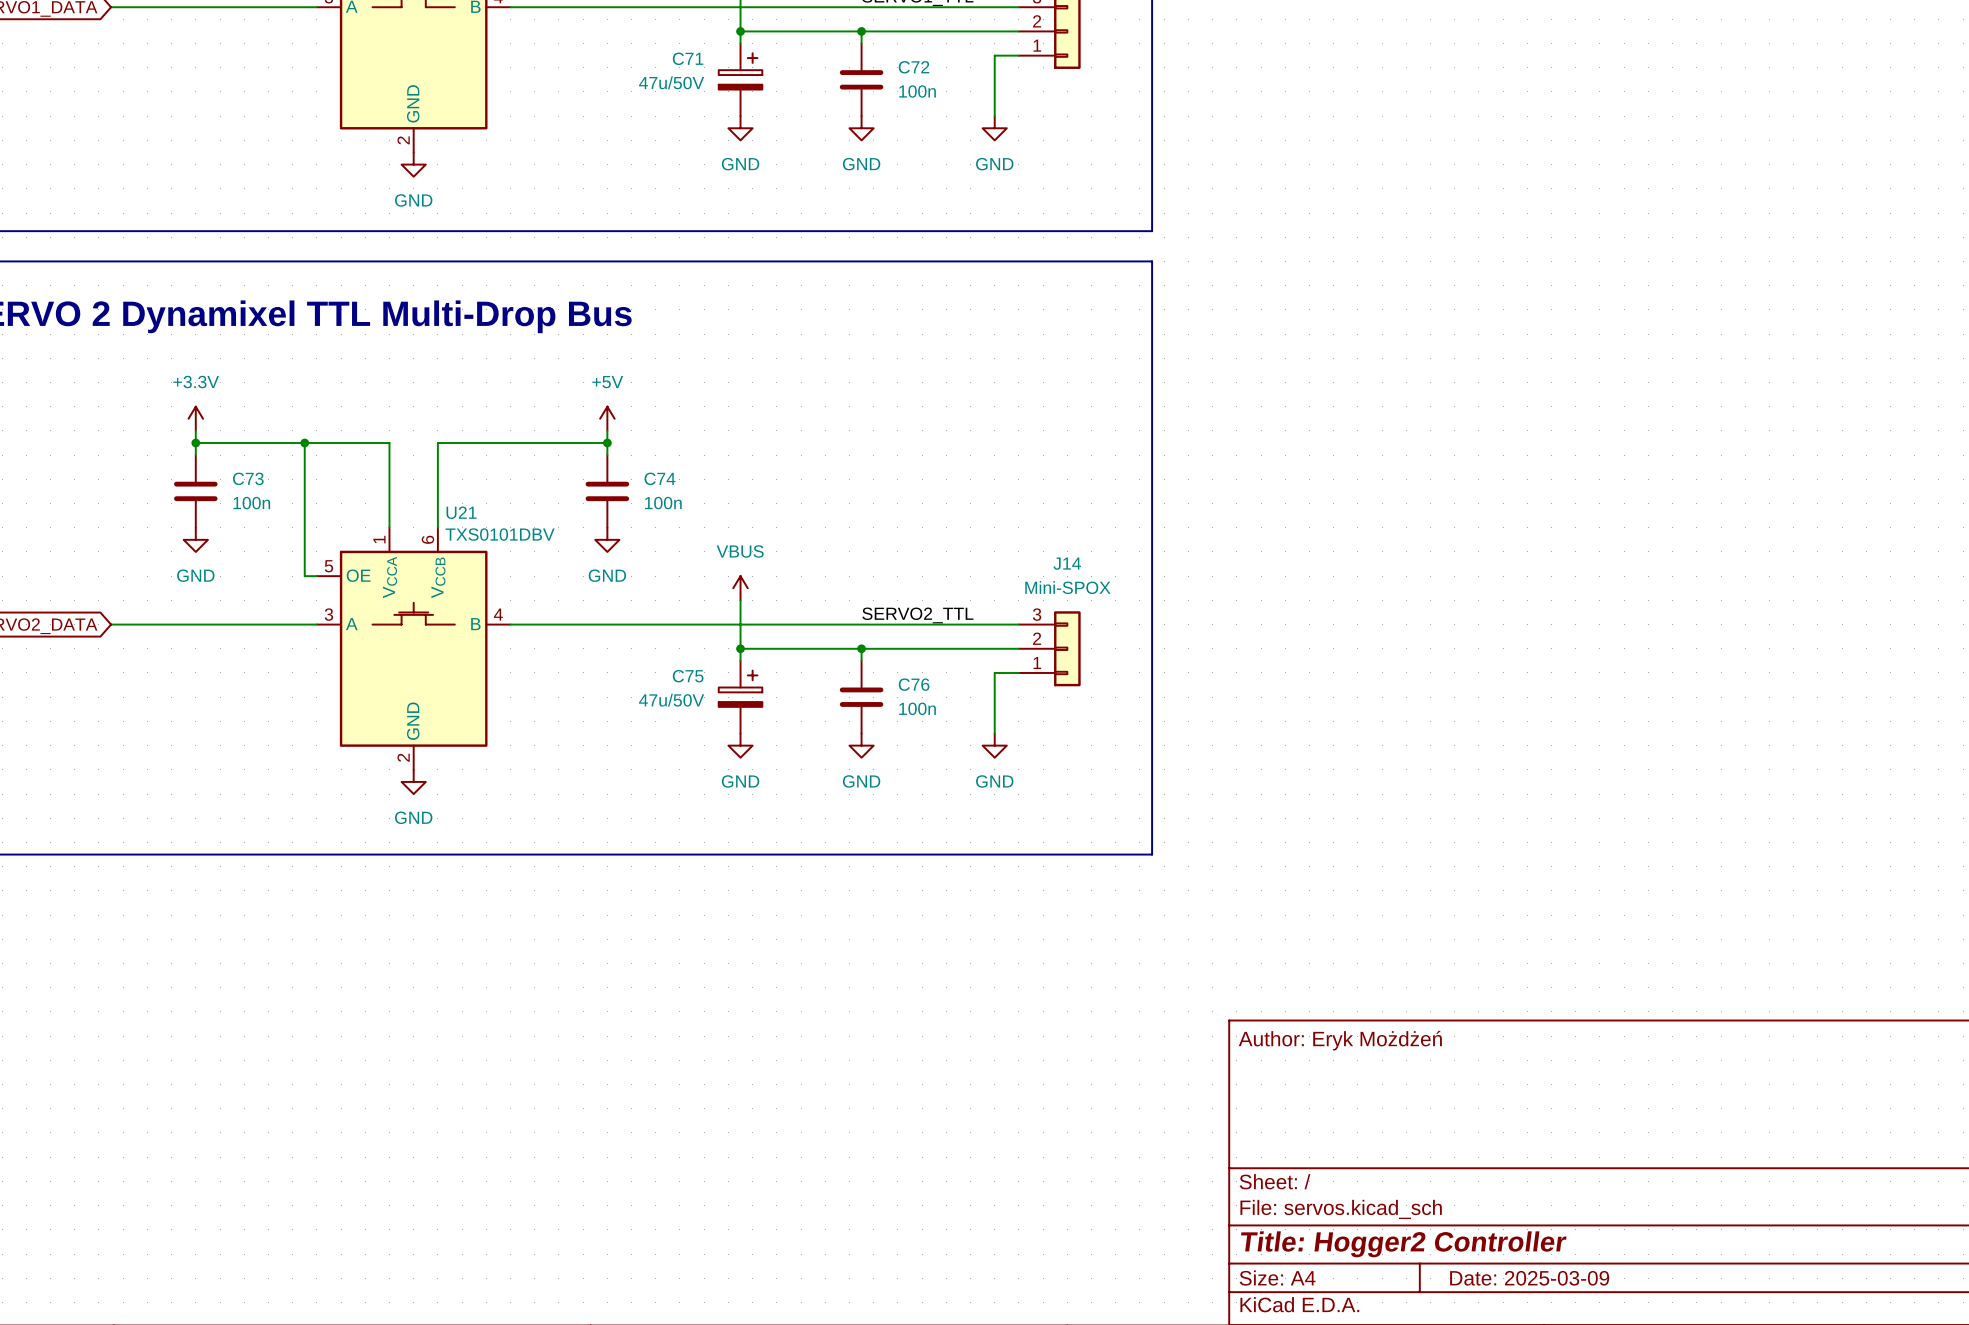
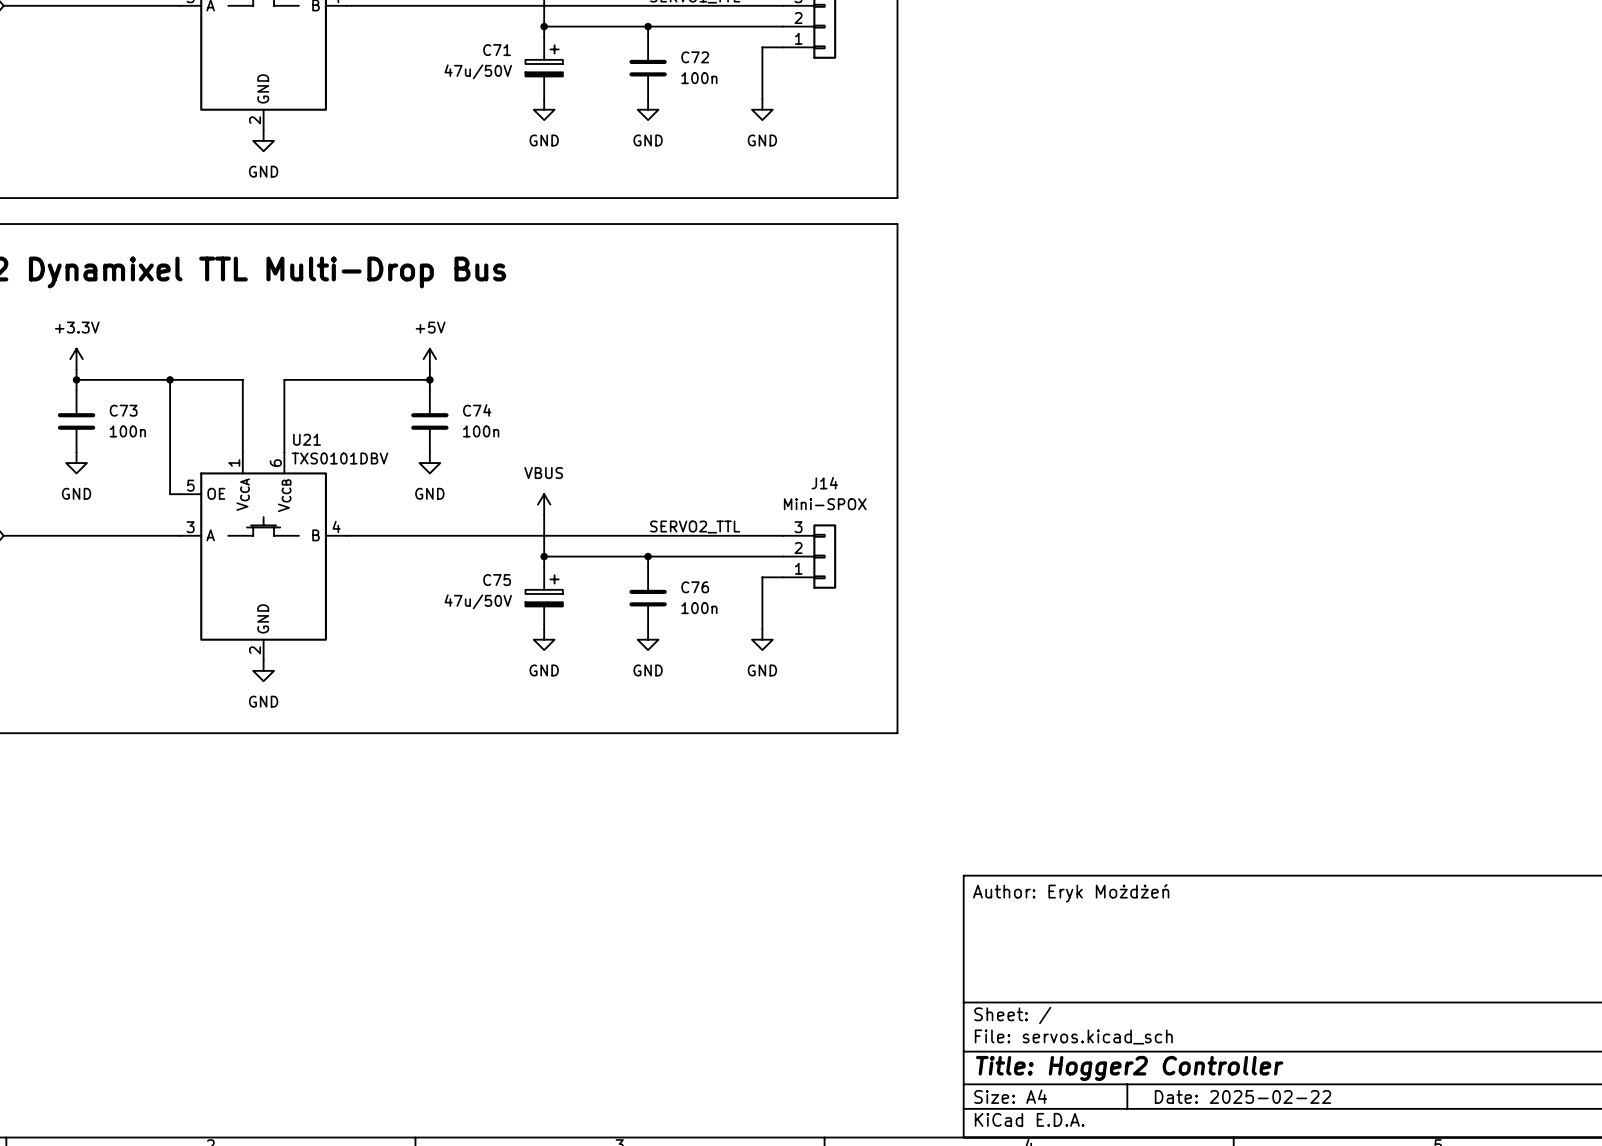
title block: Date: 2025-03-09 (1529, 1278) -> Date: 2025-02-22 (1243, 1096)

